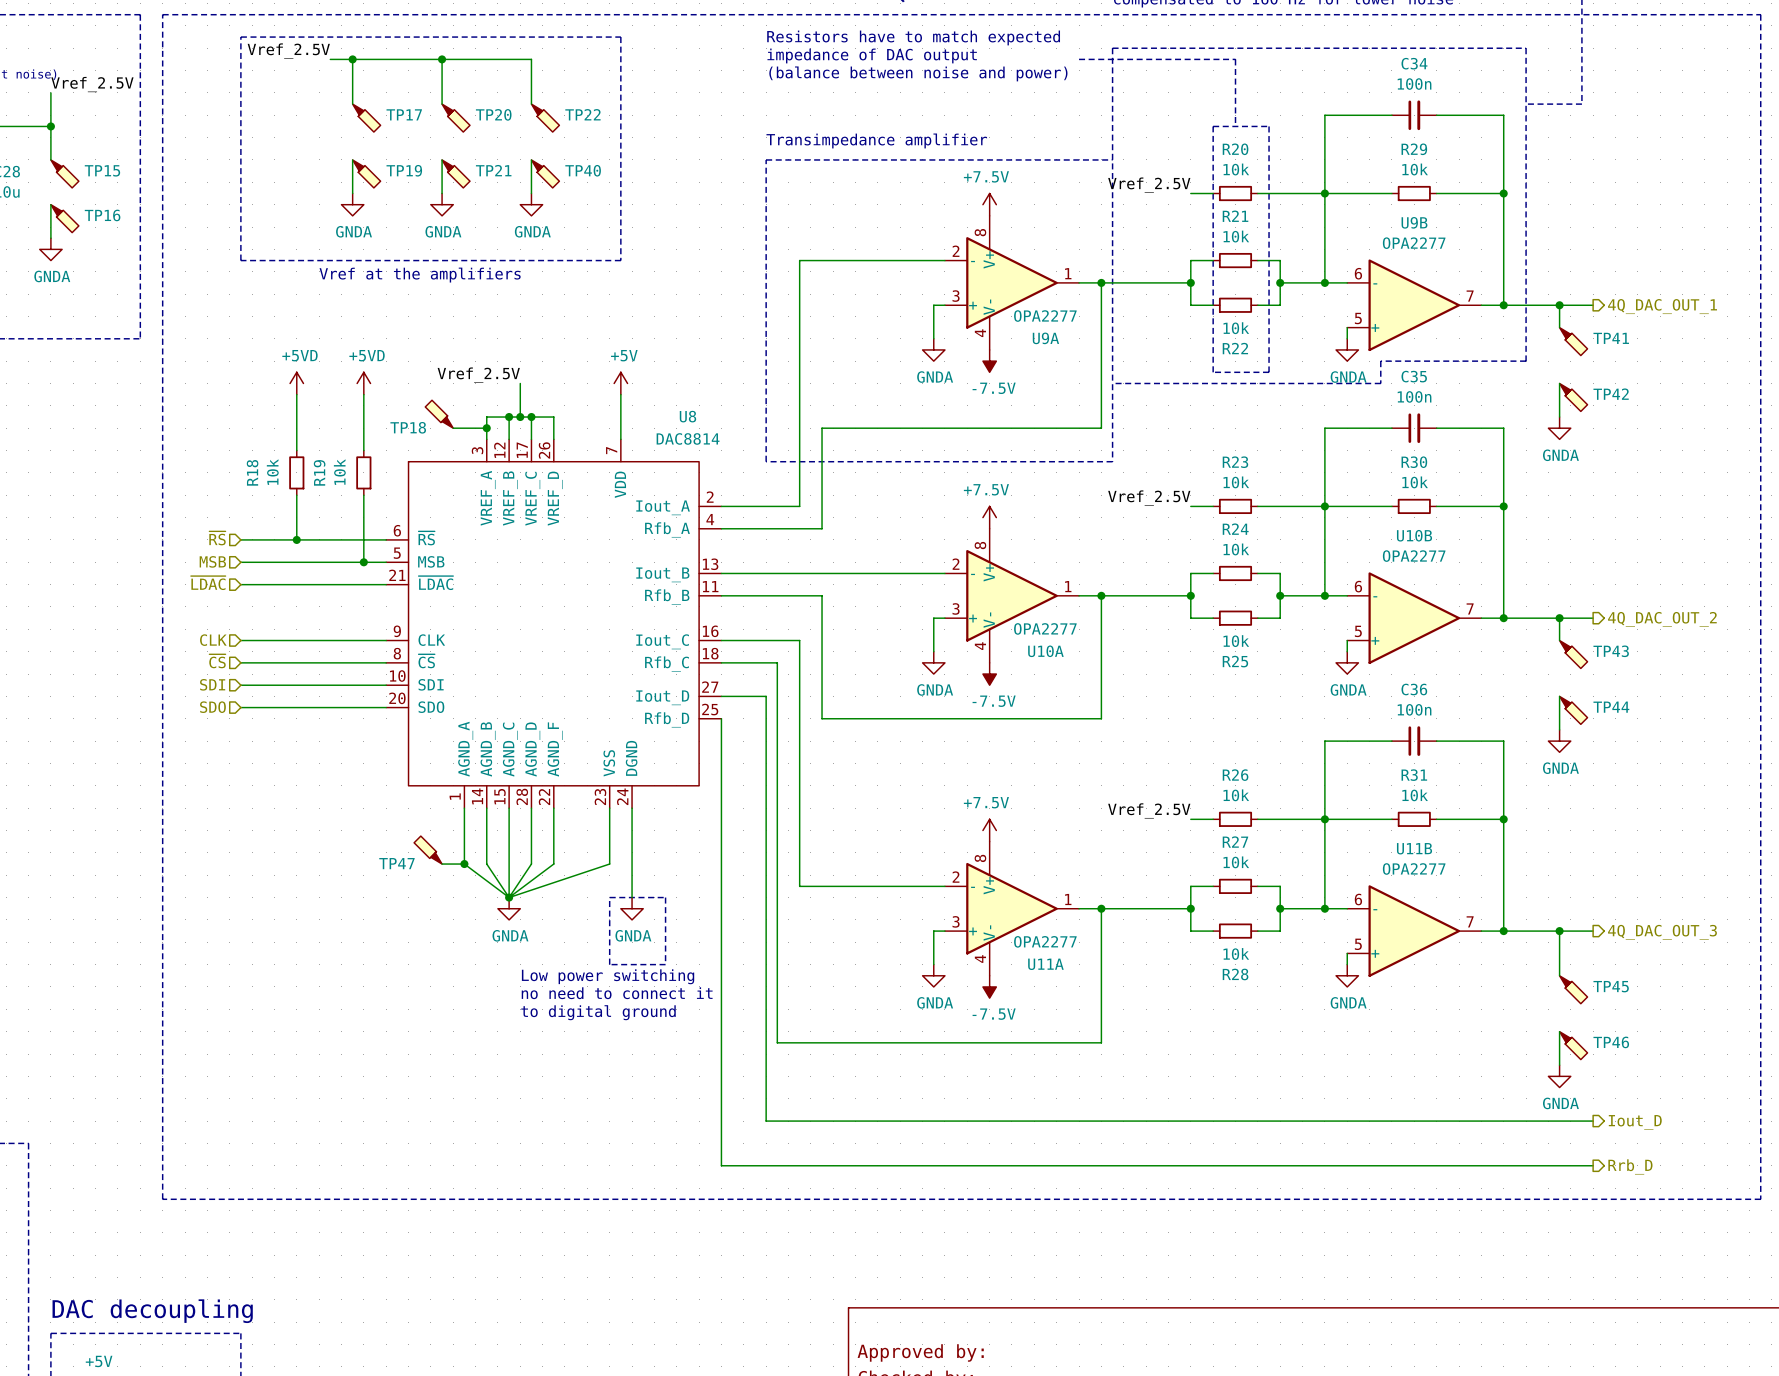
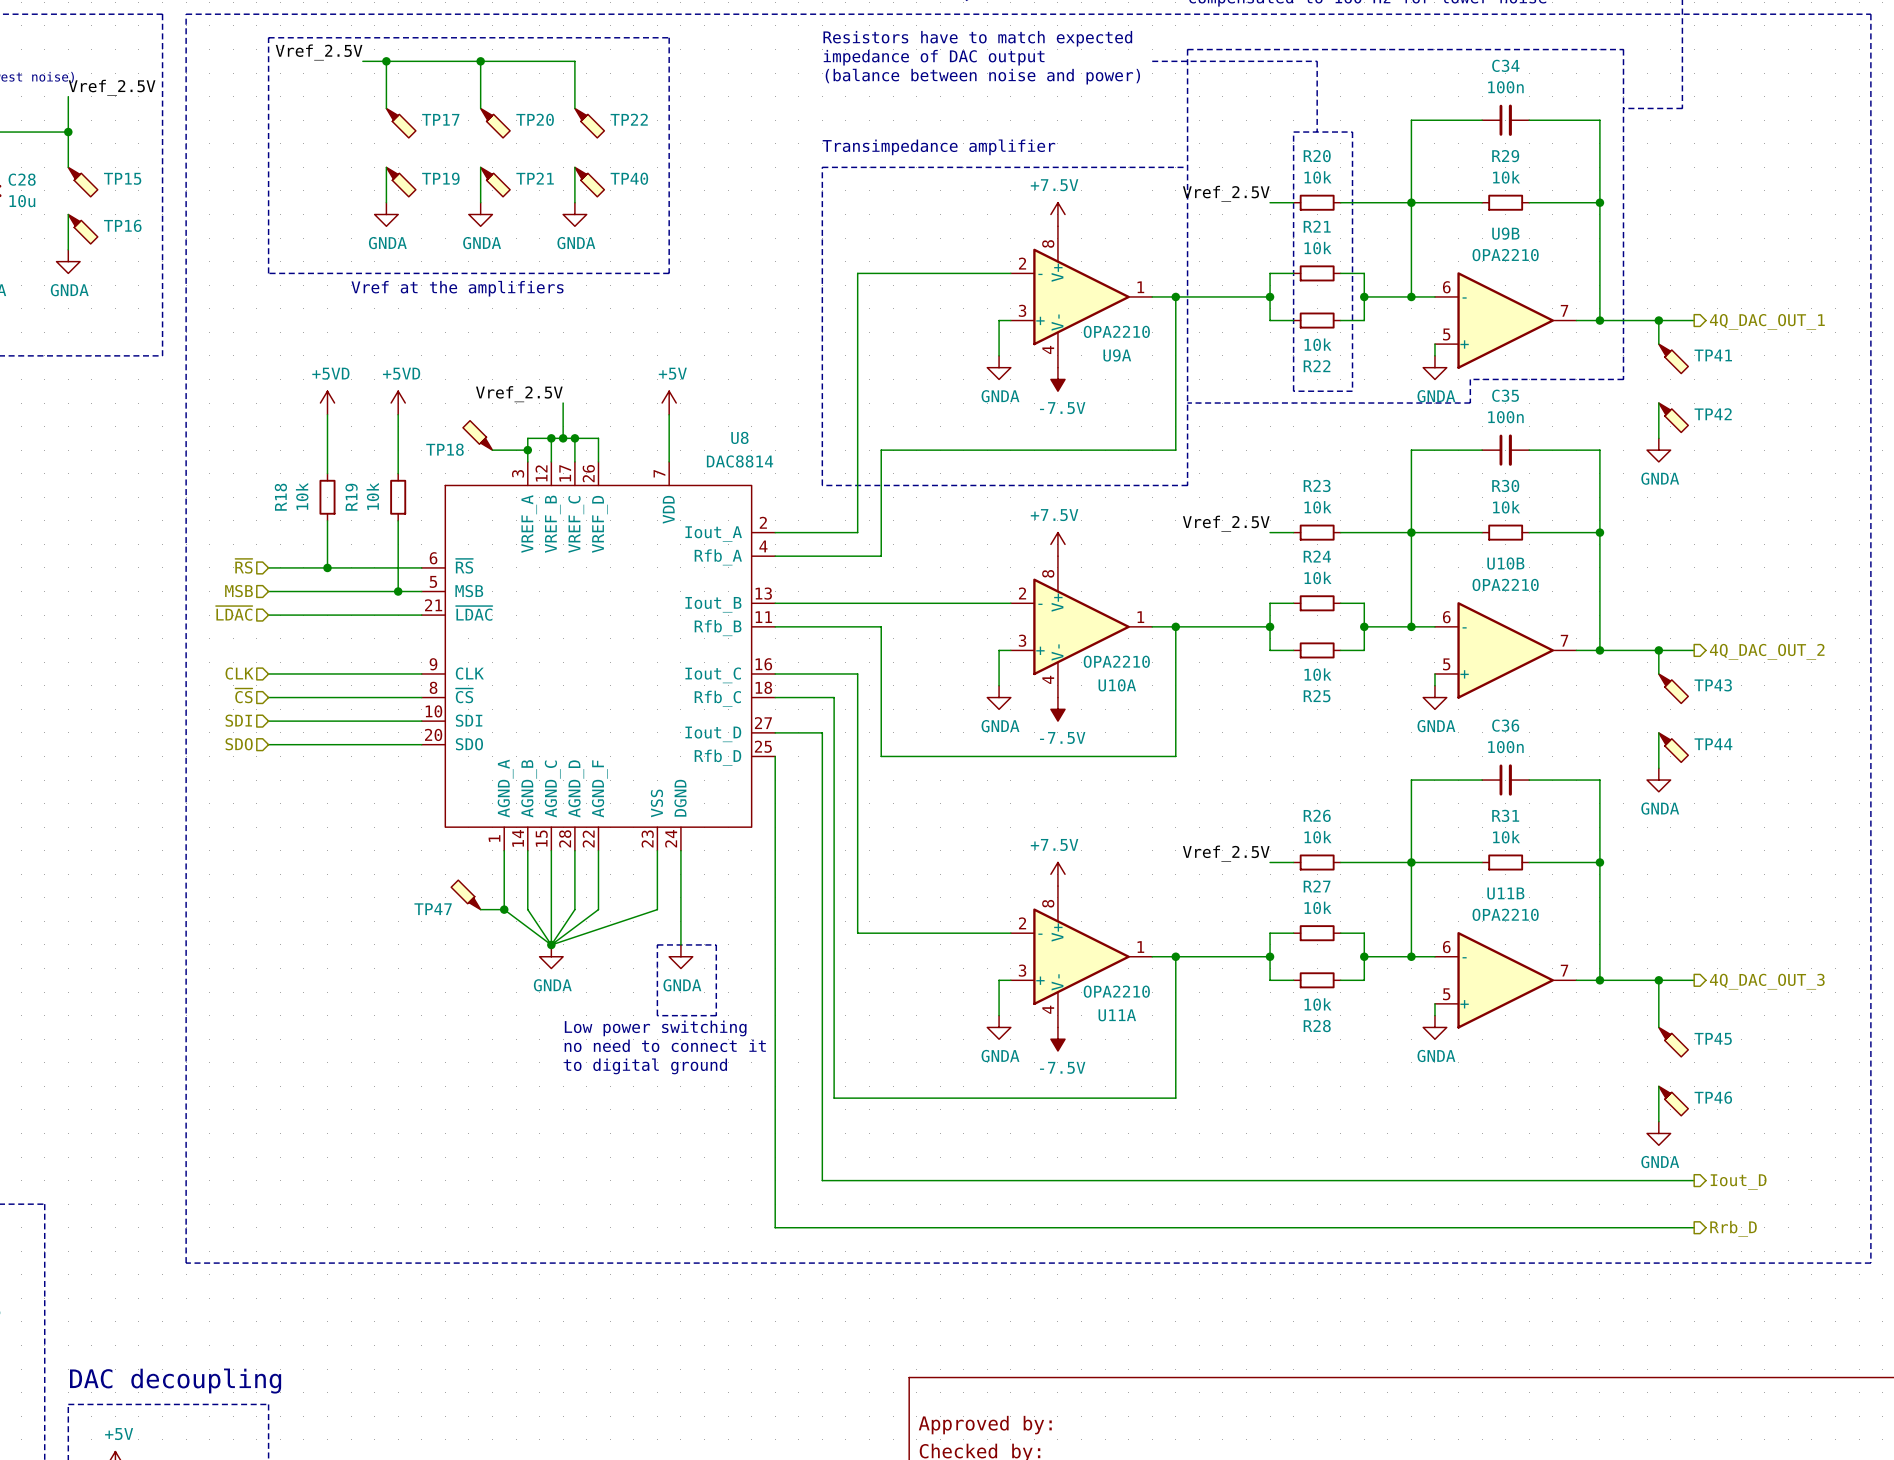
U9B value: OPA2277 (1414, 243) -> OPA2210 (1505, 255)
U9A value: OPA2277 (1045, 316) -> OPA2210 (1116, 331)
U10B value: OPA2277 (1414, 556) -> OPA2210 (1505, 584)
U10A value: OPA2277 (1045, 628) -> OPA2210 (1116, 661)
U11B value: OPA2277 (1414, 868) -> OPA2210 (1505, 914)
U11A value: OPA2277 (1045, 941) -> OPA2210 (1116, 991)

